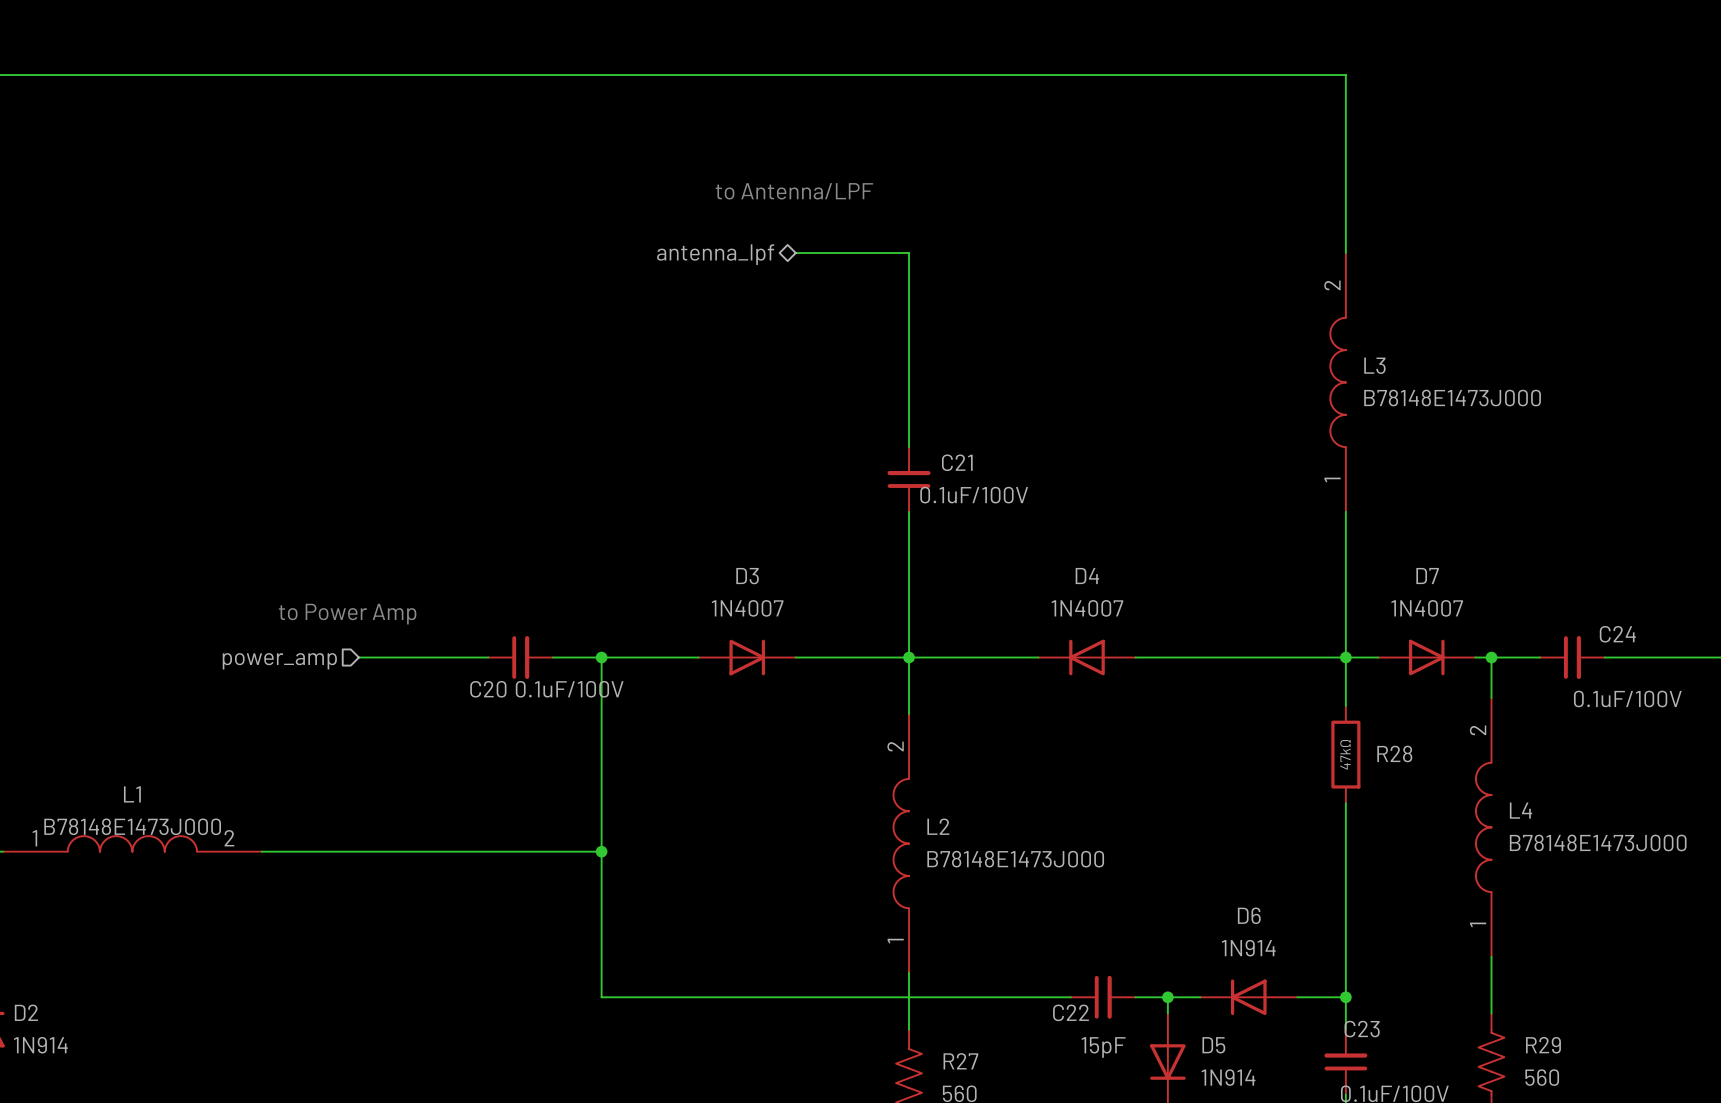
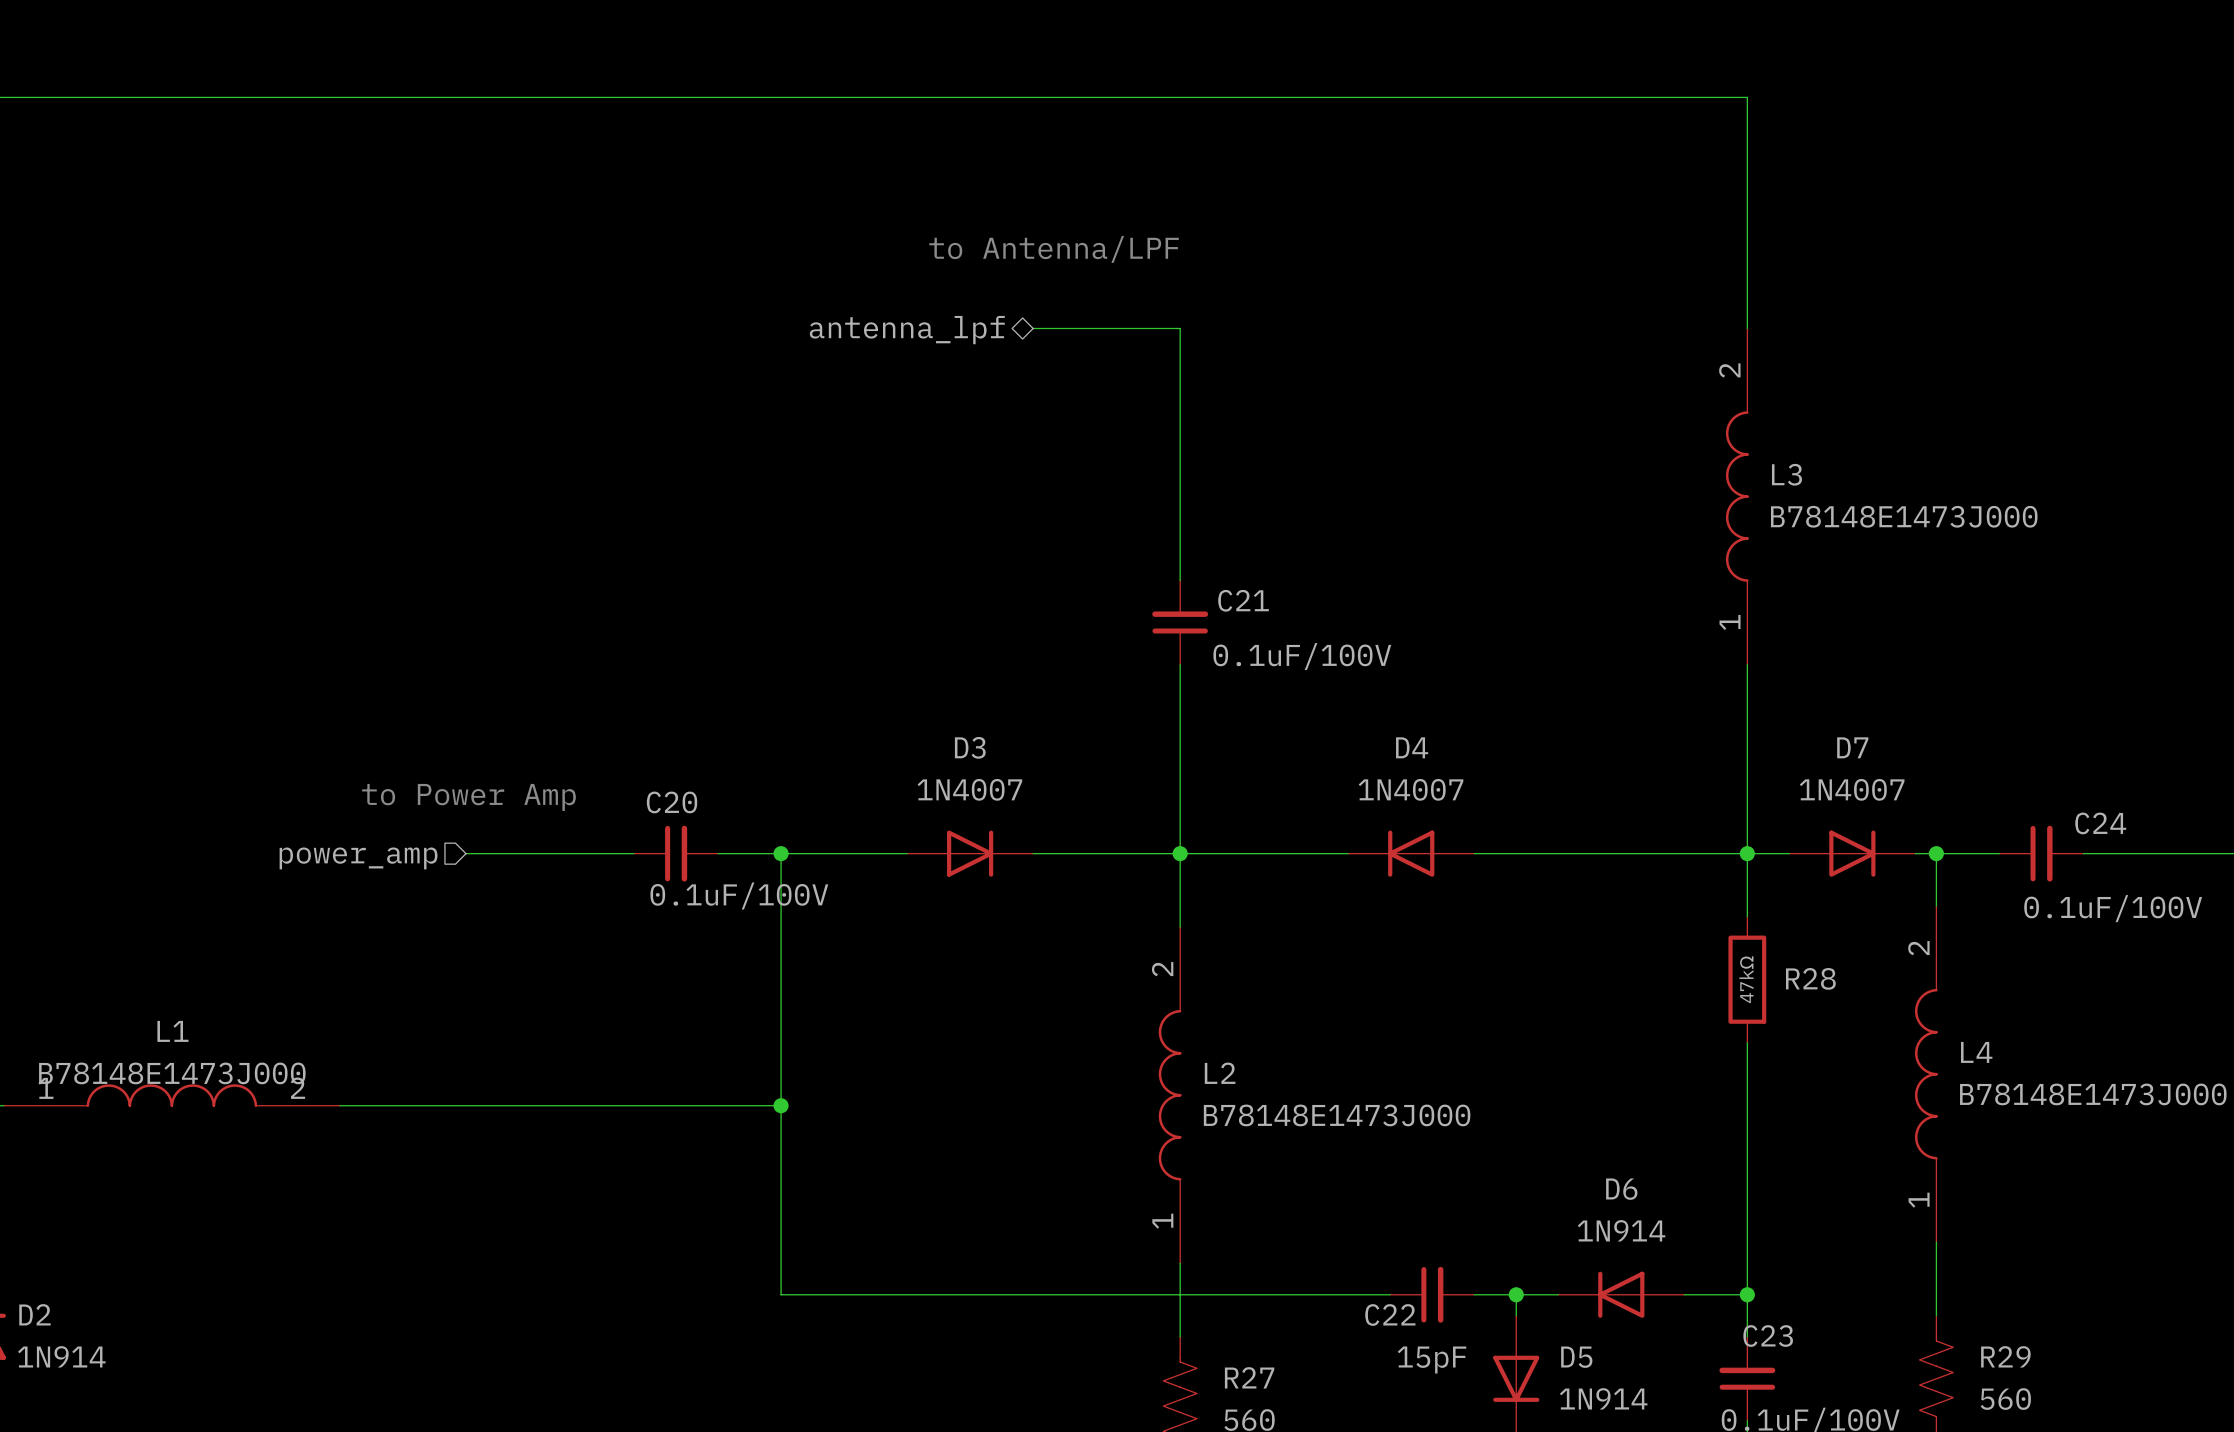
C21 value position: 0.1uF/100V (974, 495) -> 0.1uF/100V (1302, 656)
C20 name position: C20 (488, 689) -> C20 (672, 802)

